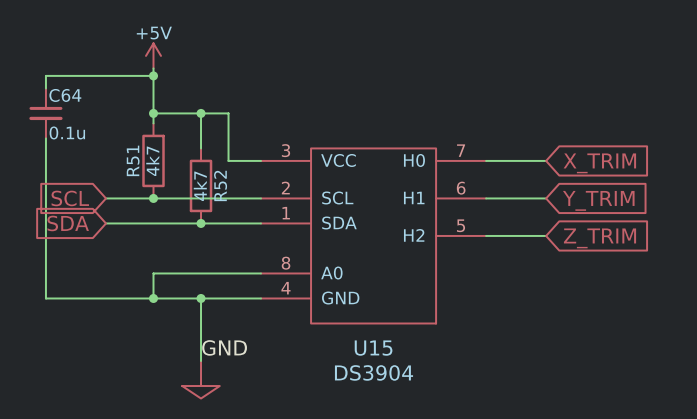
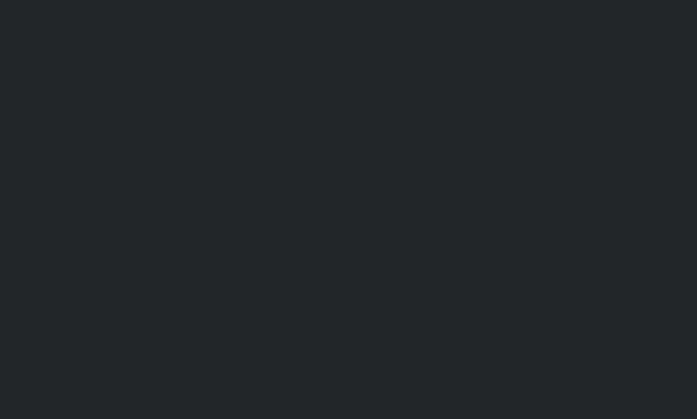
power symbol: +5V (153, 55) -> none
wire: (153, 68) (153, 123) -> none
wire: (153, 75) (45, 75) (45, 88) -> none
junction: (153, 75) -> none
C64: 0.1u (45, 113) -> none
wire: (153, 113) (228, 113) (228, 160) (261, 160) -> none
junction: (153, 113) -> none
wire: (201, 113) (201, 148) -> none
junction: (201, 113) -> none
wire: (45, 138) (45, 298) (261, 298) -> none
R51: 4k7 (153, 160) -> none
wire: (486, 160) (546, 160) -> none
global label: X_TRIM (599, 163) -> none
R52: 4k7 (201, 185) -> none
global label: SCL (70, 198) -> none
wire: (105, 198) (261, 198) -> none
junction: (153, 198) -> none
wire: (486, 198) (546, 198) -> none
global label: Y_TRIM (598, 200) -> none
global label: SDA (68, 223) -> none
wire: (105, 223) (261, 223) -> none
junction: (201, 223) -> none
U15: DS3904 (373, 235) -> none
wire: (486, 235) (546, 235) -> none
global label: Z_TRIM (600, 238) -> none
wire: (261, 273) (153, 273) (153, 298) -> none
junction: (153, 298) -> none
wire: (201, 298) (201, 361) -> none
junction: (201, 298) -> none
label: GND (224, 347) -> none
power symbol: (201, 379) -> none

